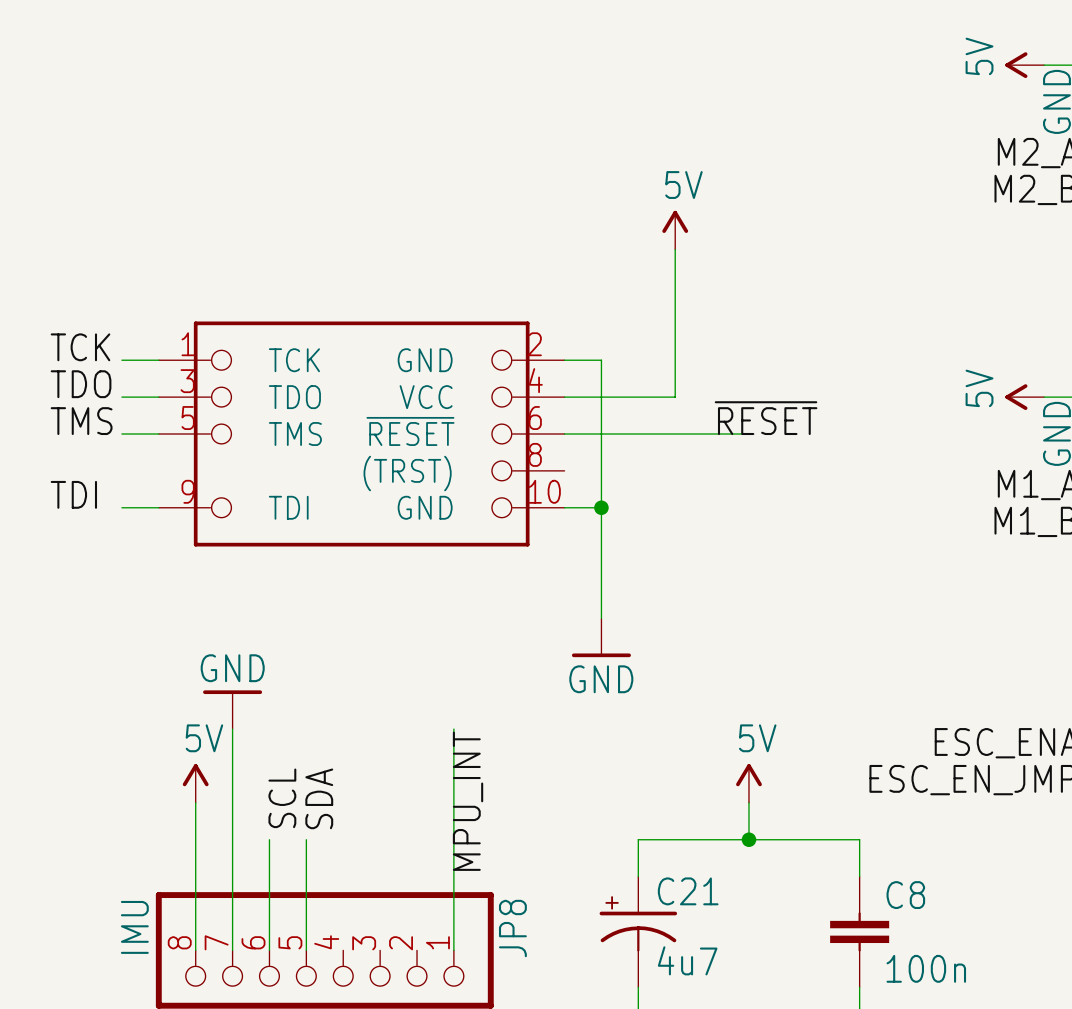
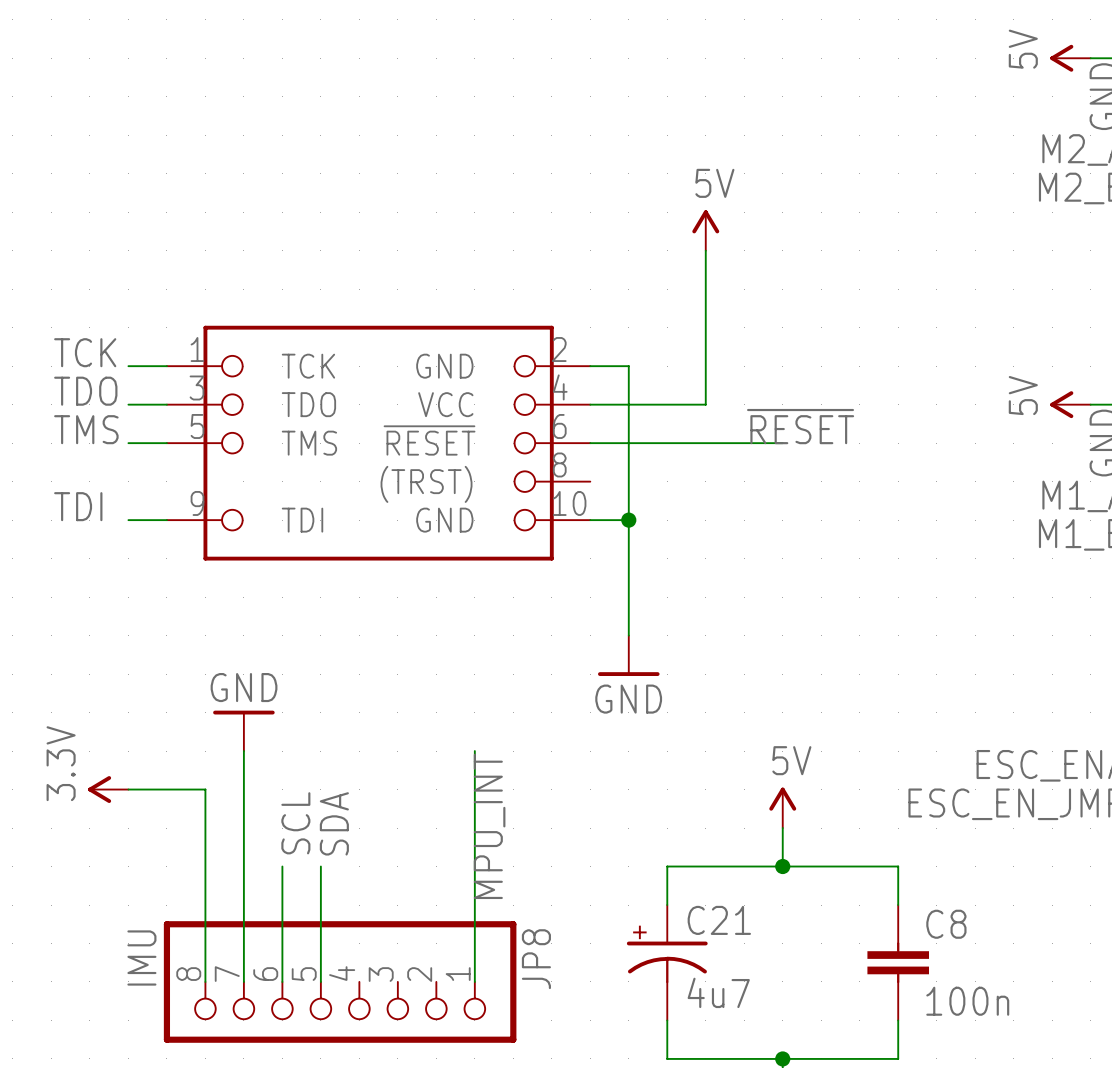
power symbol: none -> 3.3V (108, 789)
wire: none -> (128, 789) (205, 789) (205, 828)
power symbol: 5V (195, 783) -> none

